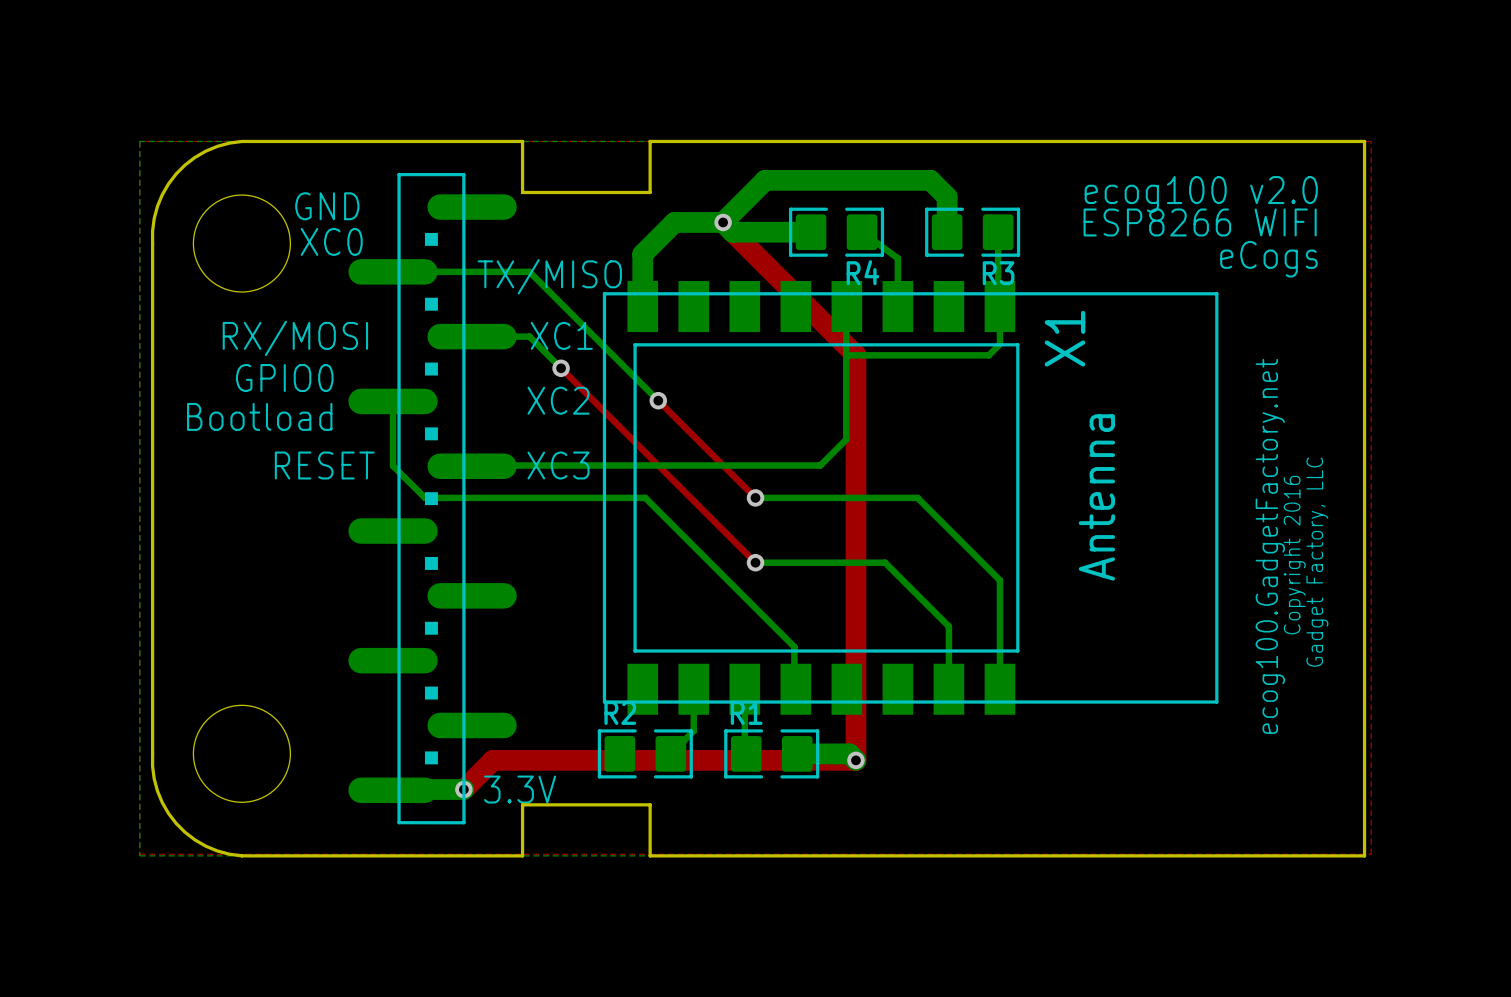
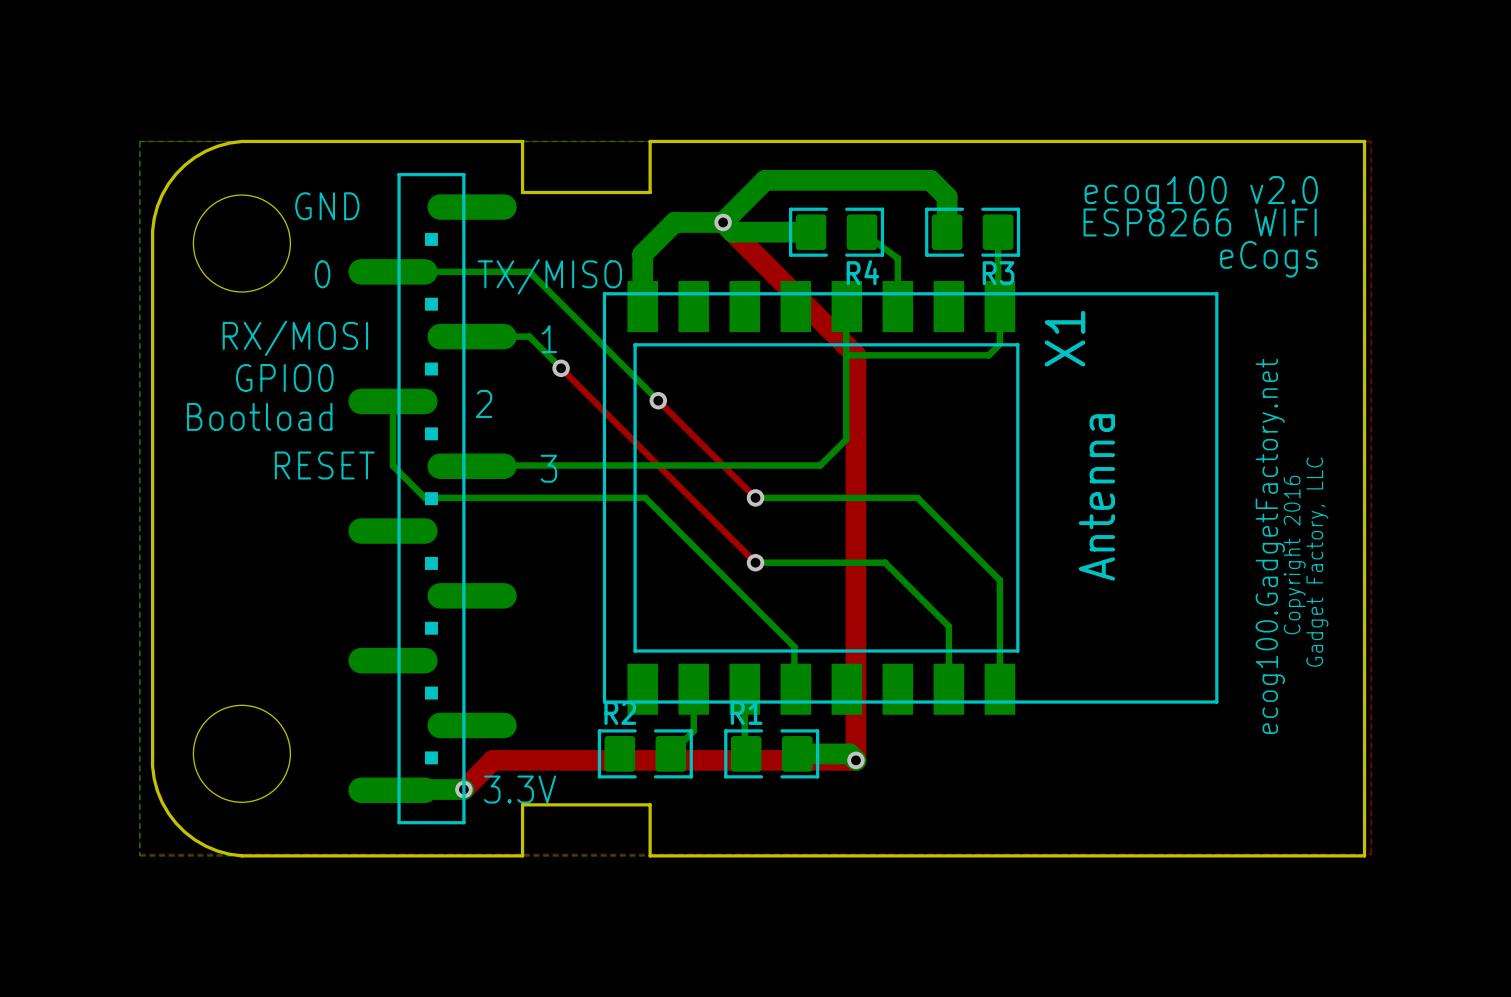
text: XC0 (331, 241) -> none
text: none -> 0 (322, 274)
text: XC1 (561, 335) -> none
text: none -> 1 (549, 339)
text: XC2 (558, 400) -> none
text: none -> 2 (484, 403)
text: XC3 (558, 465) -> none
text: none -> 3 (548, 468)

